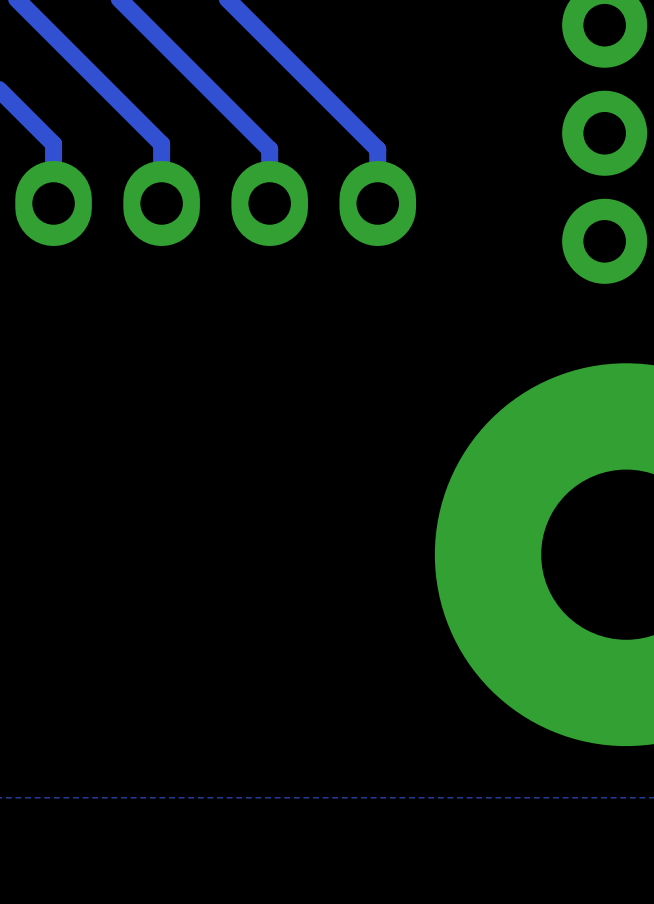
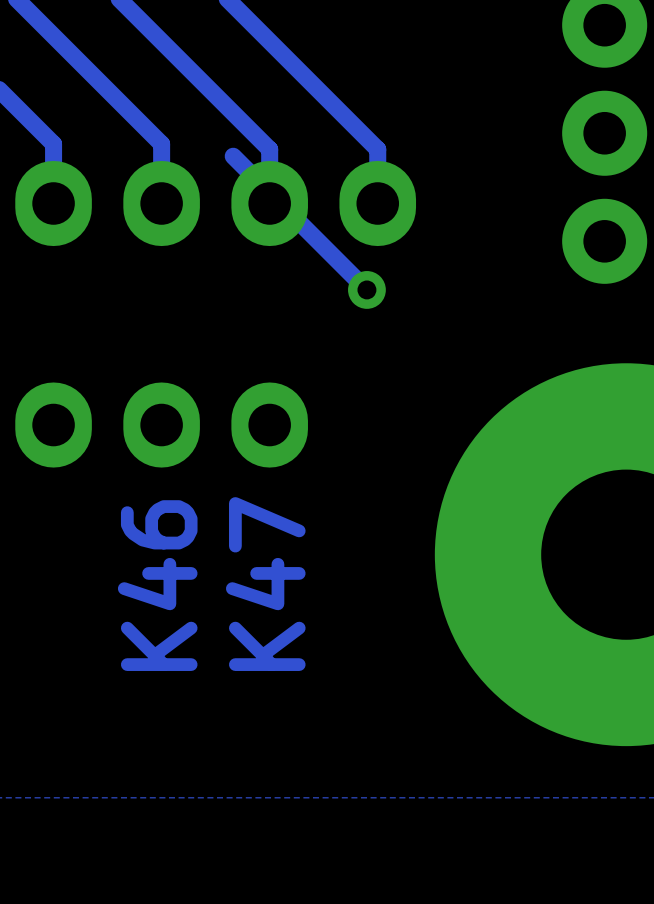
track: none -> (233, 156) (366, 289)
via: none -> (366, 289)
part: none -> (53, 425)
part: none -> (161, 425)
part: none -> (269, 425)
text: none -> K46 (157, 585)
text: none -> K47 (265, 584)

